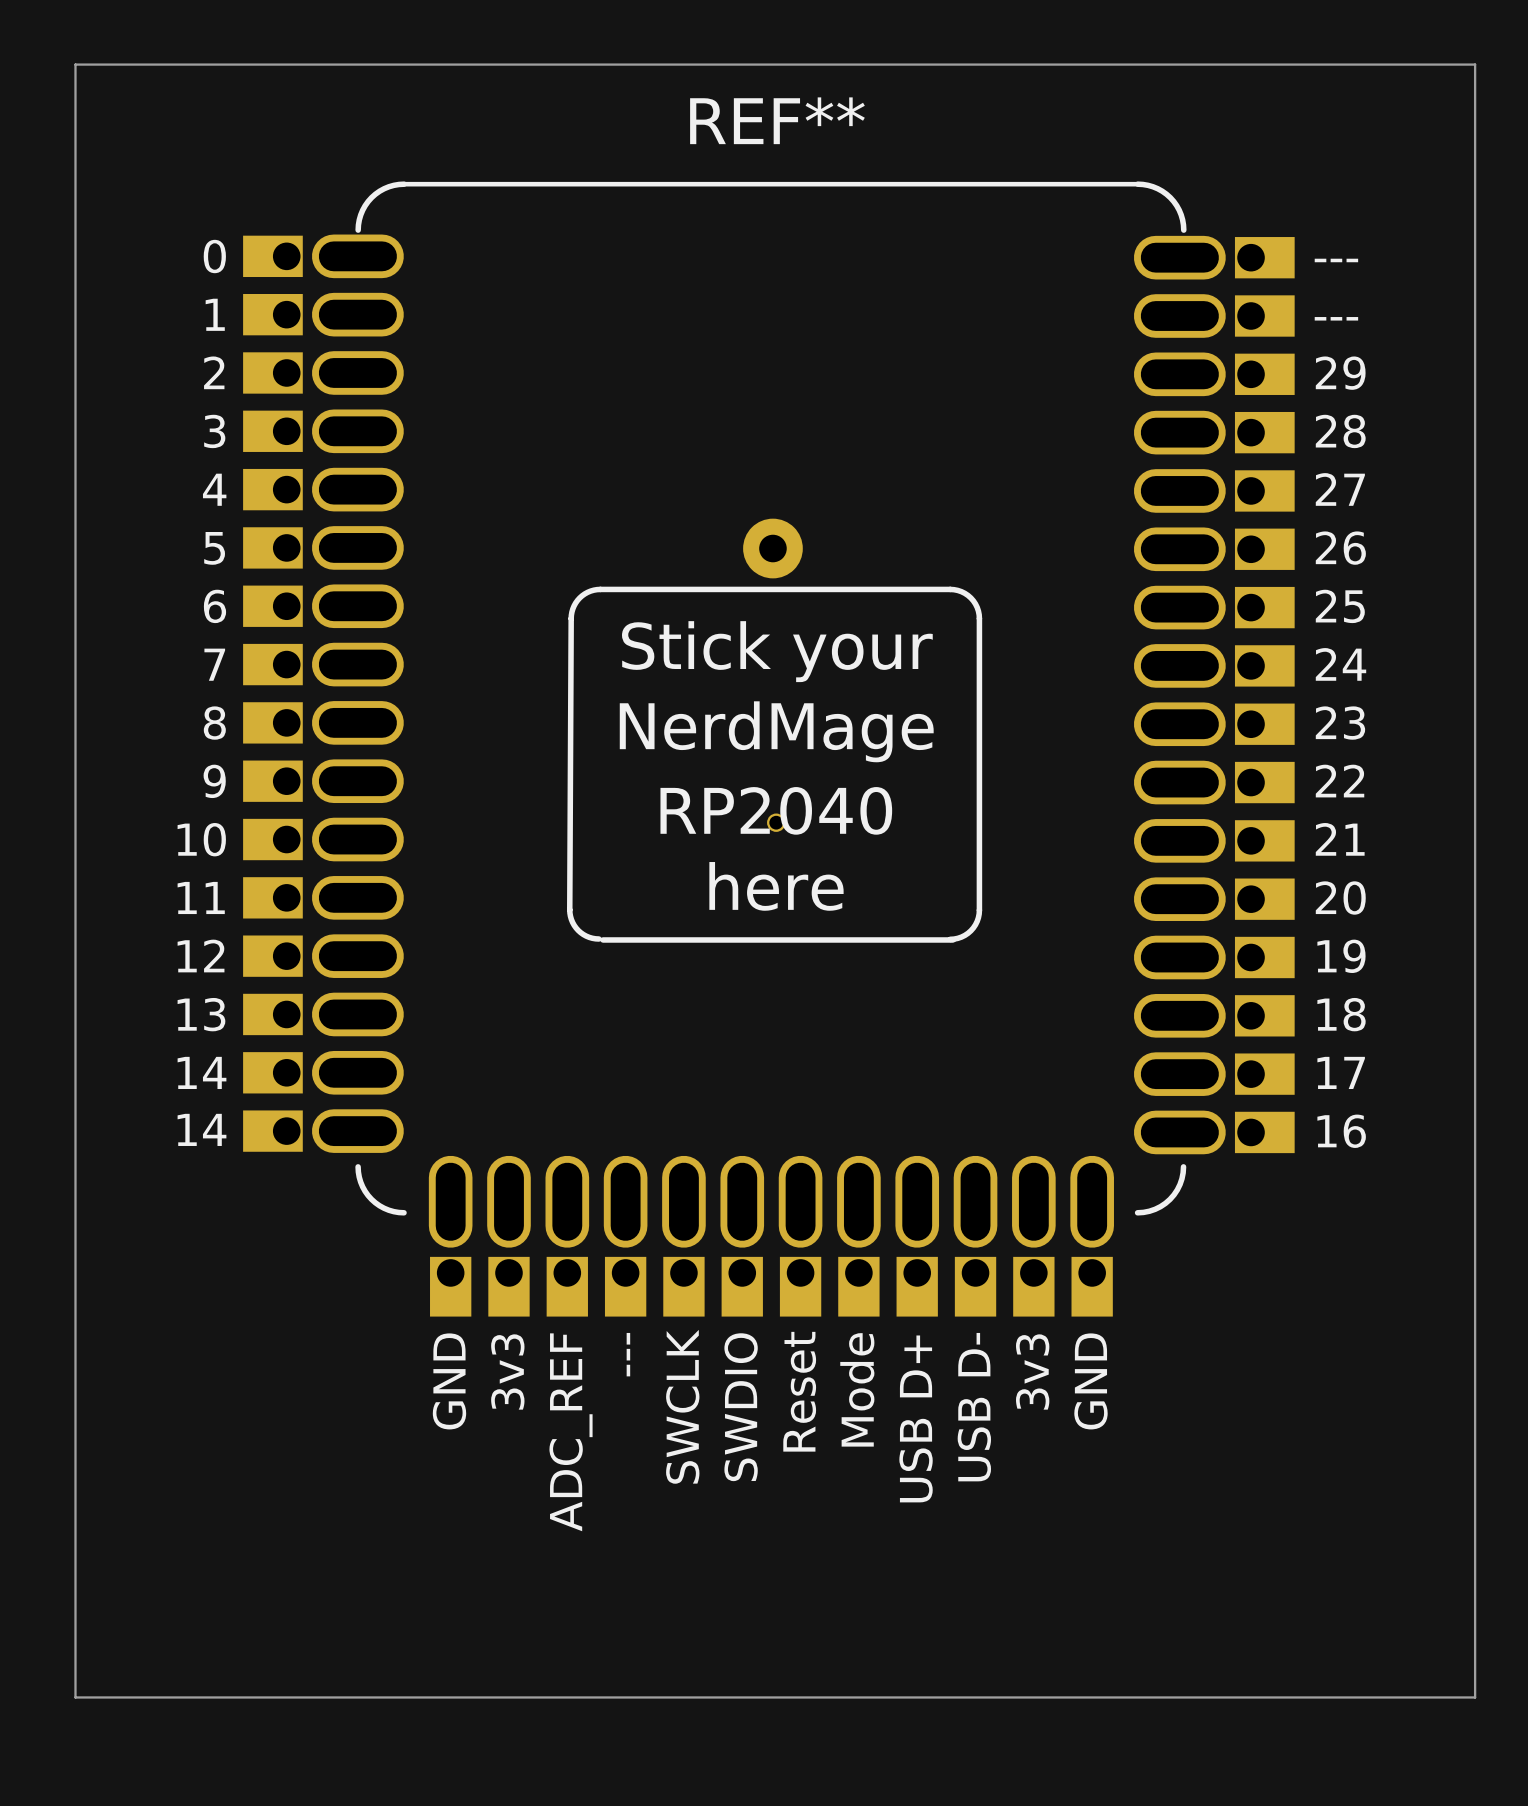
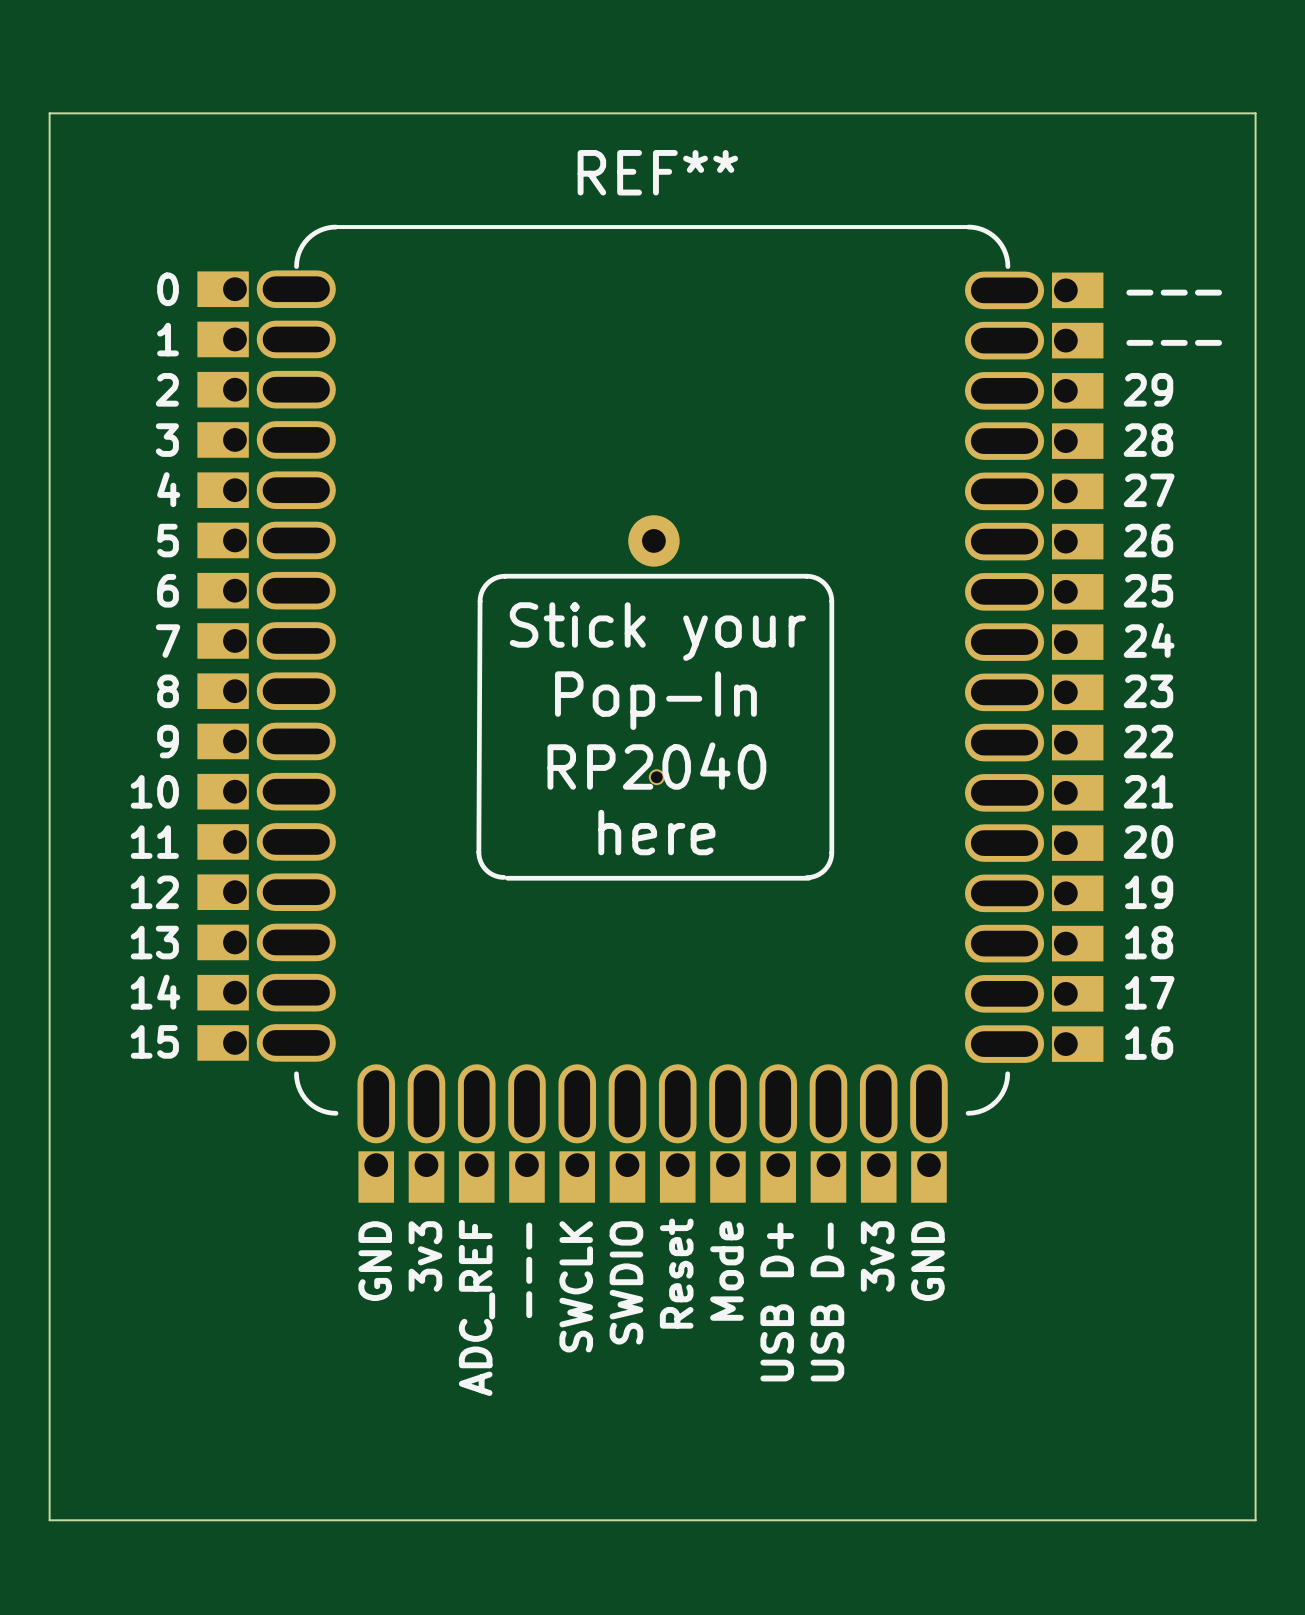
REF** footprint: [243, 181, 1295, 1317] -> [197, 224, 1104, 1203]

